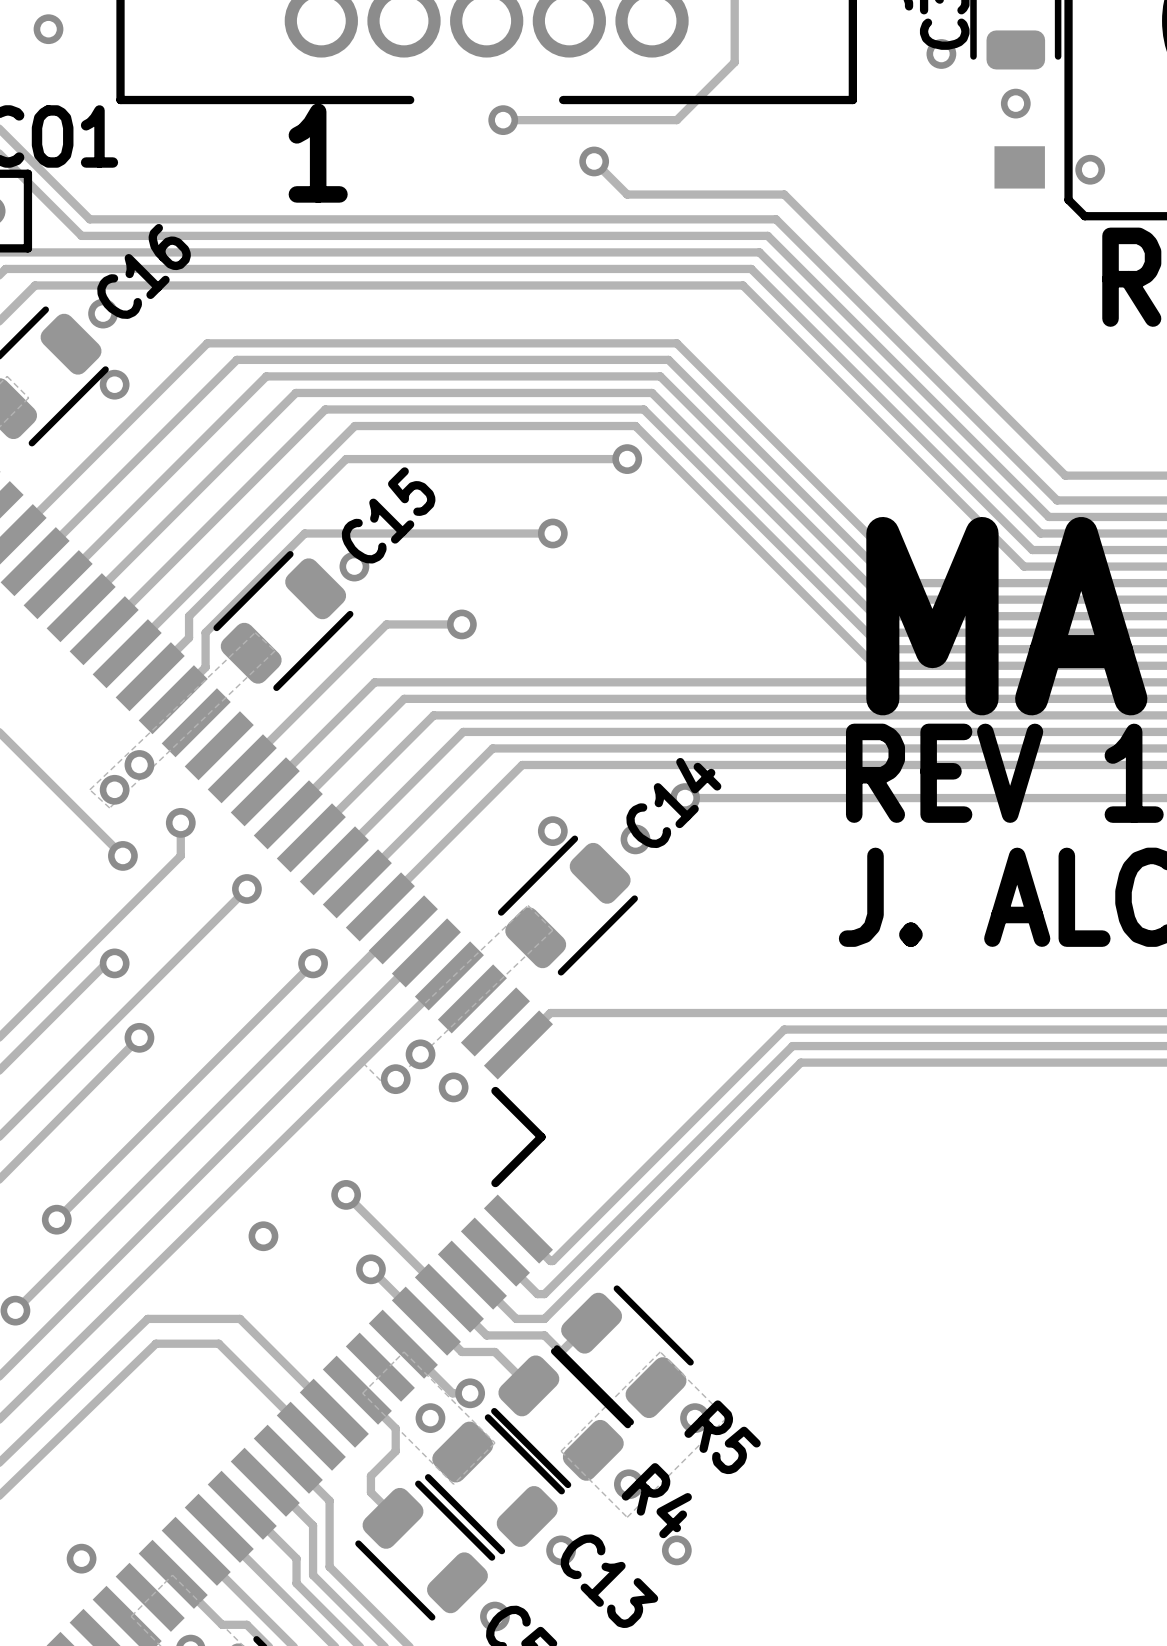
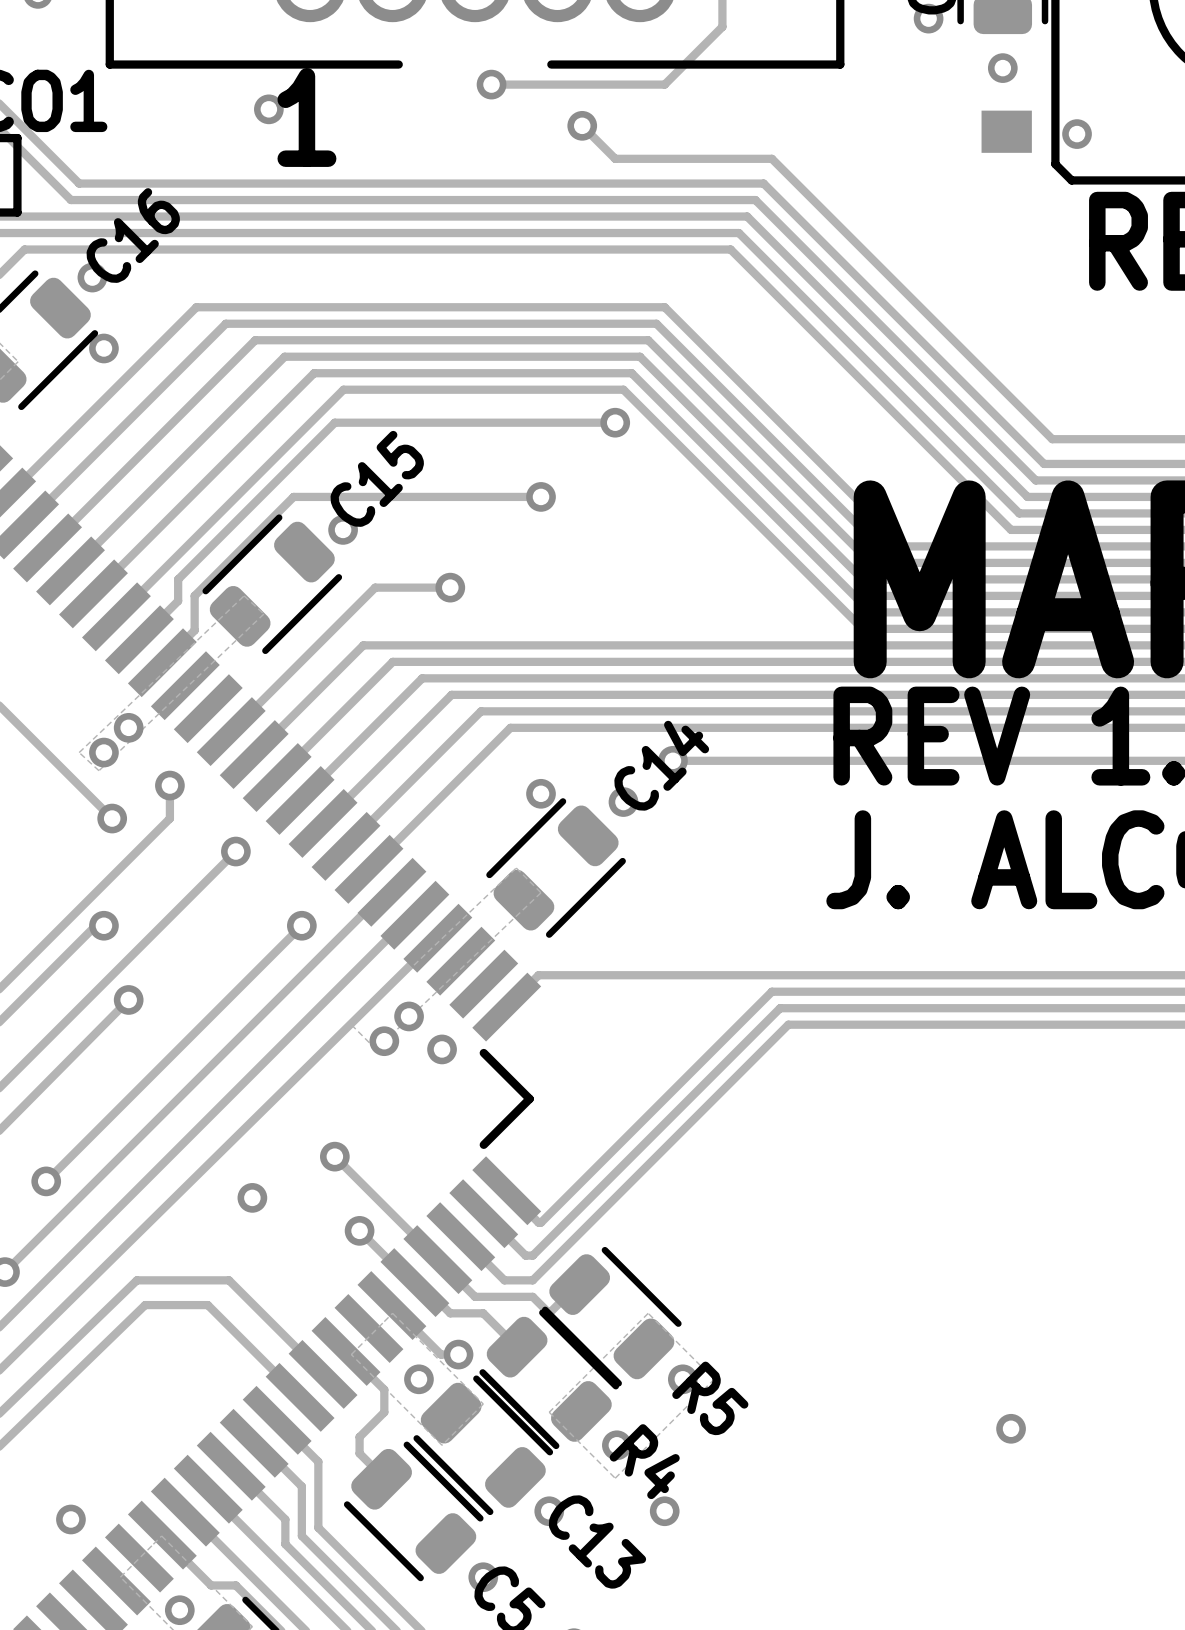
via: none -> (268, 109)
via: none -> (1011, 1428)

